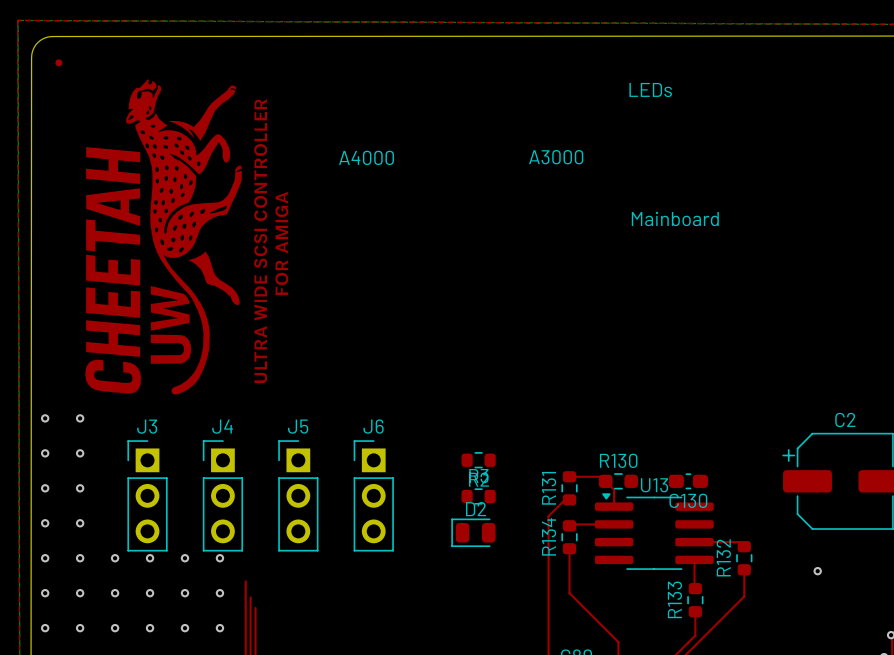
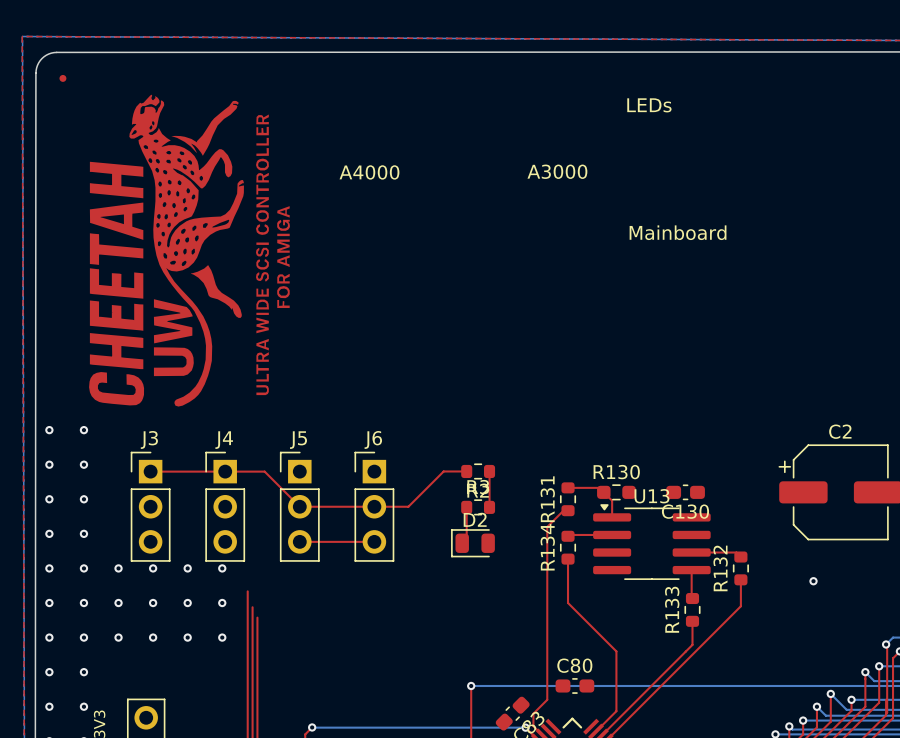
top track: none -> (466, 471) (443, 471) (408, 506) (299, 506) (264, 471) (150, 471)
top track: none -> (489, 471) (489, 507)
top track: none -> (466, 507) (466, 538) (462, 543)
top track: none -> (299, 541) (374, 541)

